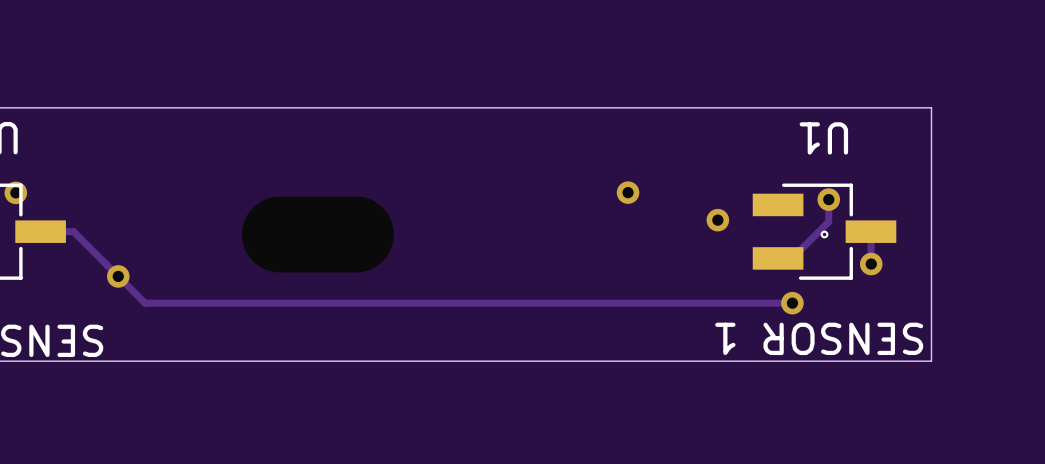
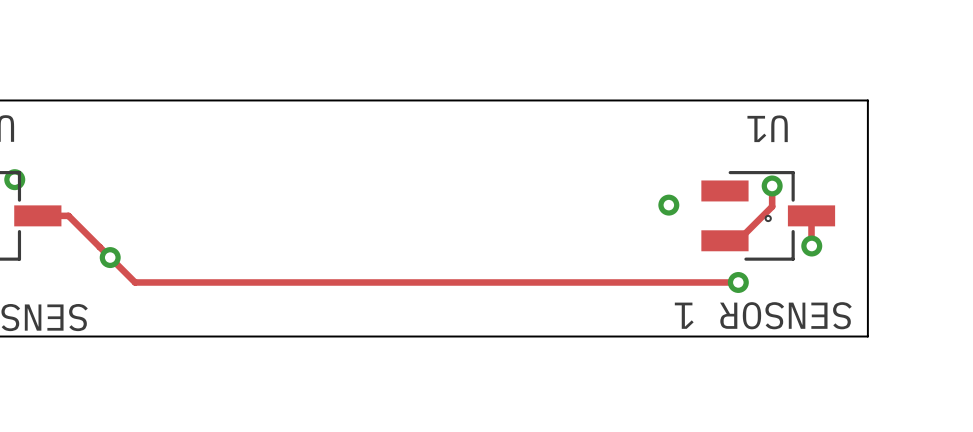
via: (628, 192) -> none

